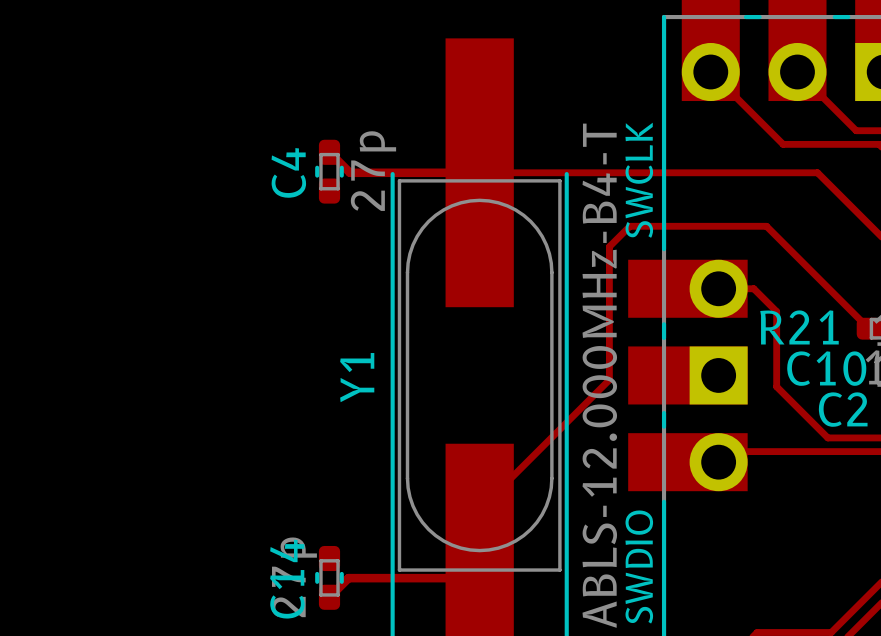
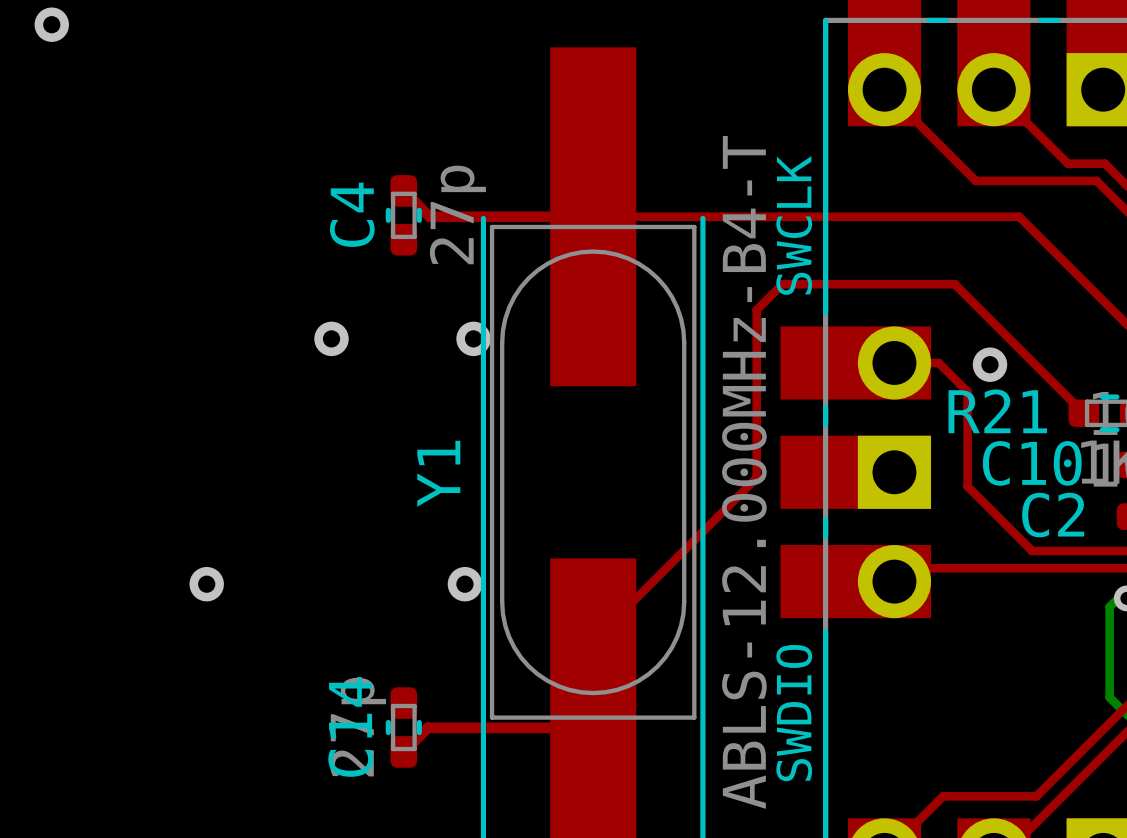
via: none -> (51, 24)
via: none -> (331, 338)
via: none -> (473, 338)
via: none -> (990, 364)
via: none -> (206, 584)
via: none -> (464, 584)

